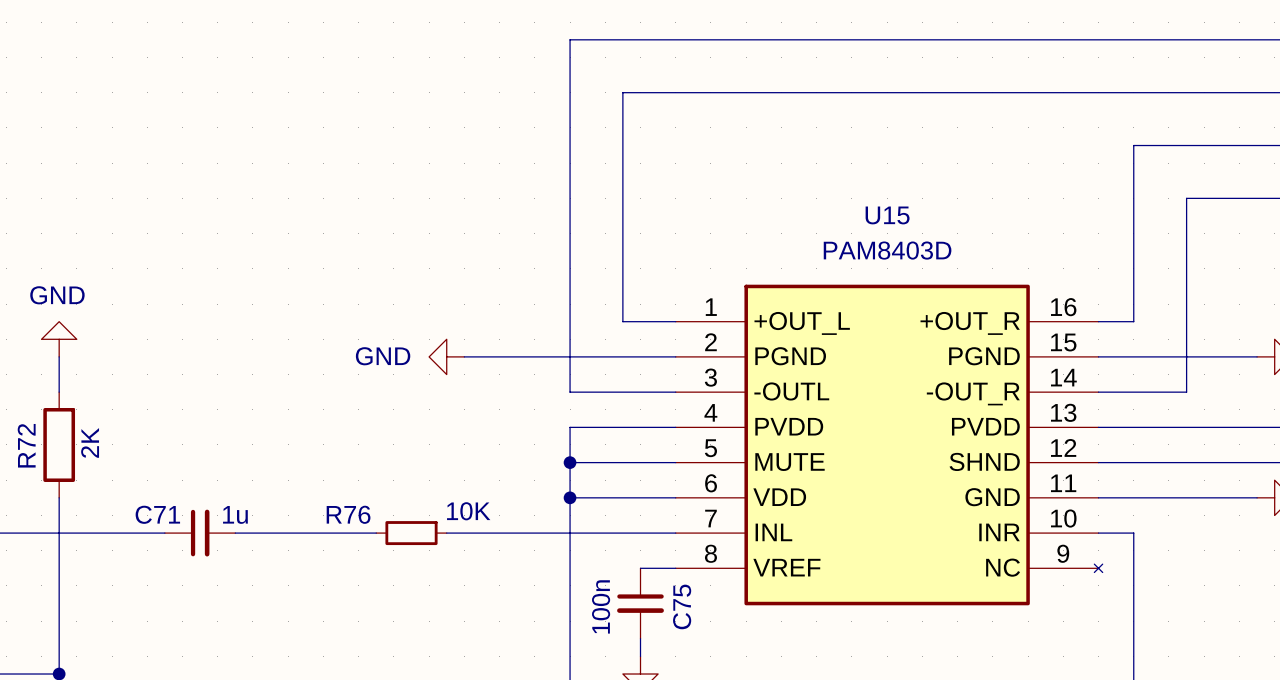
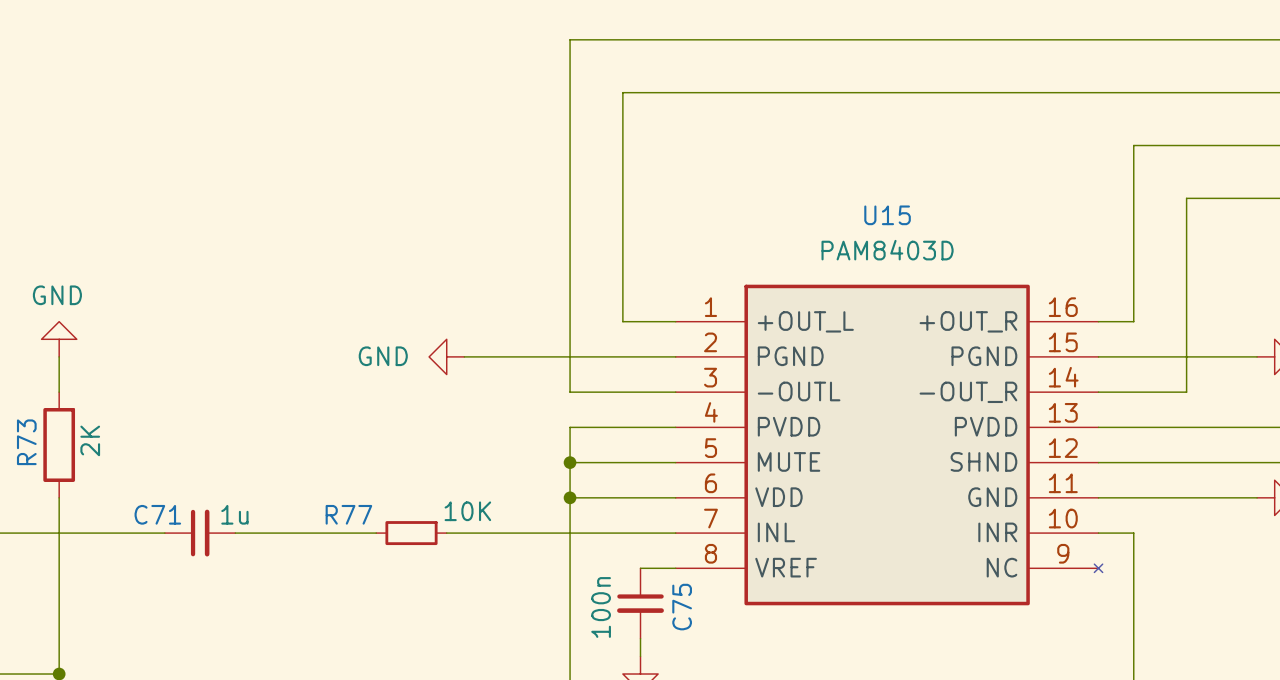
R72 name: R72 (26, 445) -> R73 (26, 442)
R76 name: R76 (348, 514) -> R77 (348, 514)

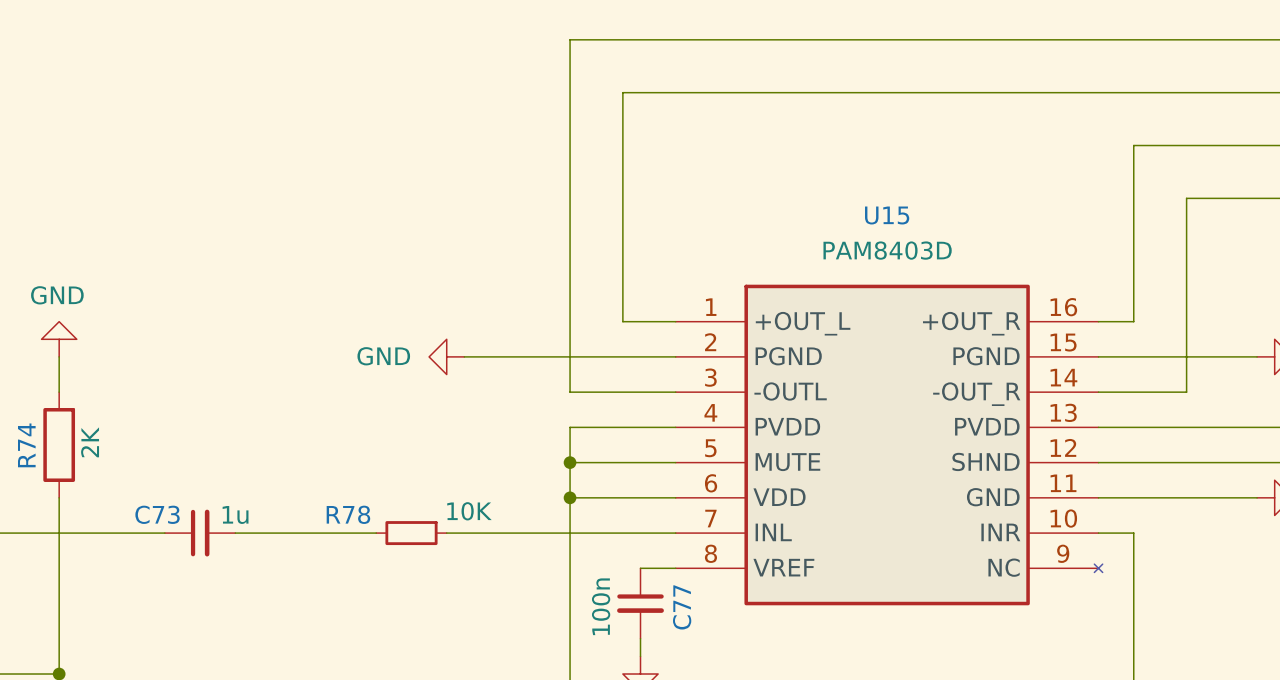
R73 name: R73 (26, 442) -> R74 (26, 445)
C71 name: C71 (157, 514) -> C73 (157, 514)
R77 name: R77 (348, 514) -> R78 (348, 514)
C75 name: C75 (682, 607) -> C77 (682, 607)

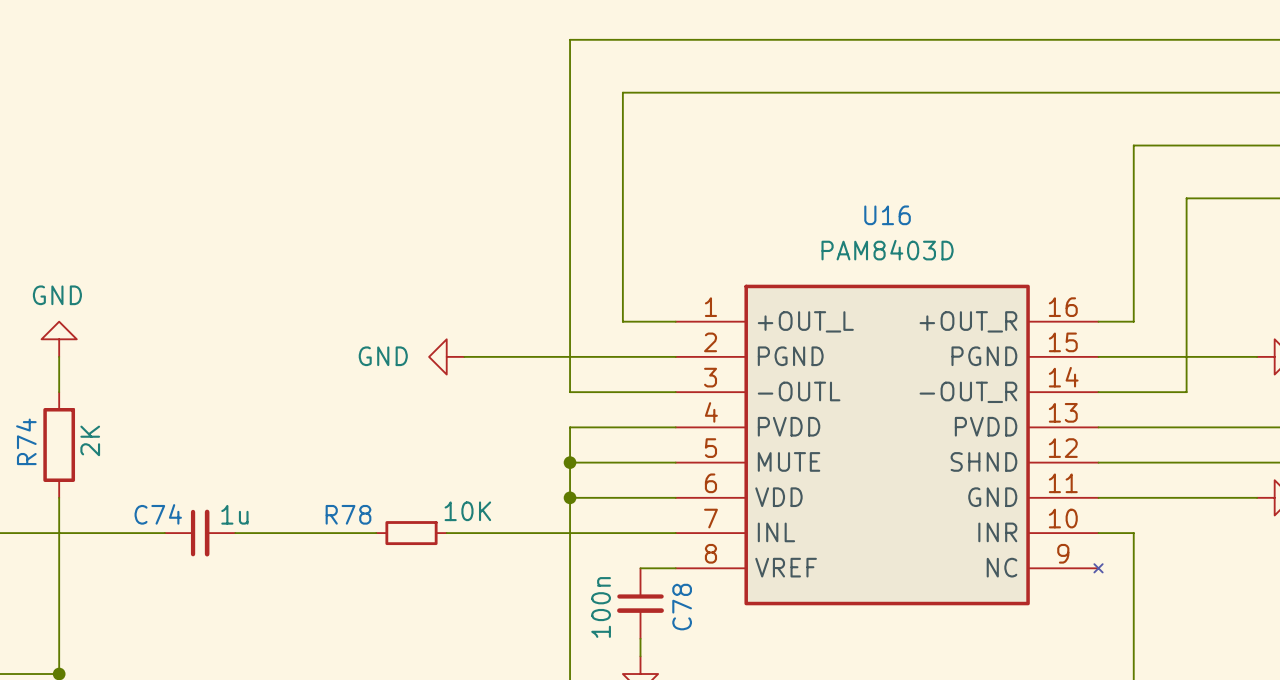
U15 name: U15 (887, 215) -> U16 (887, 215)
C73 name: C73 (157, 514) -> C74 (158, 514)
C77 name: C77 (682, 607) -> C78 (682, 607)

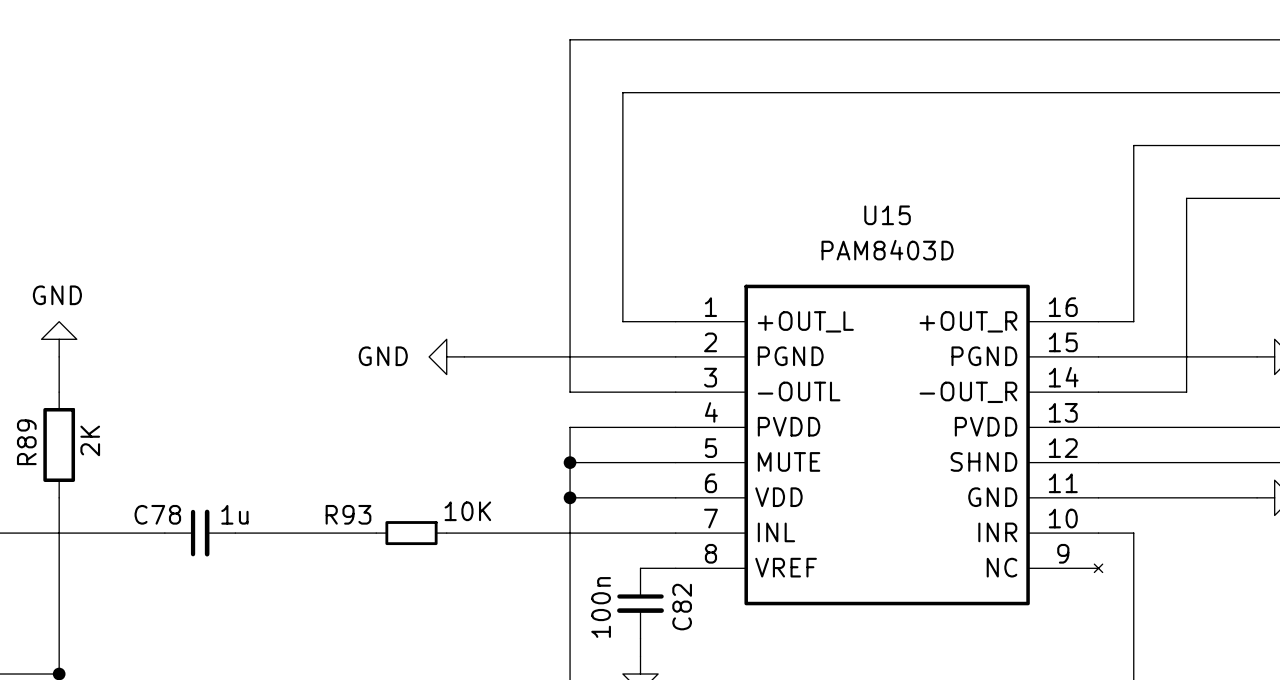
U16 name: U16 (887, 215) -> U15 (887, 215)
R74 name: R74 (26, 441) -> R89 (26, 442)
C74 name: C74 (158, 514) -> C78 (157, 514)
R78 name: R78 (348, 514) -> R93 (348, 514)
C78 name: C78 (682, 607) -> C82 (682, 607)

